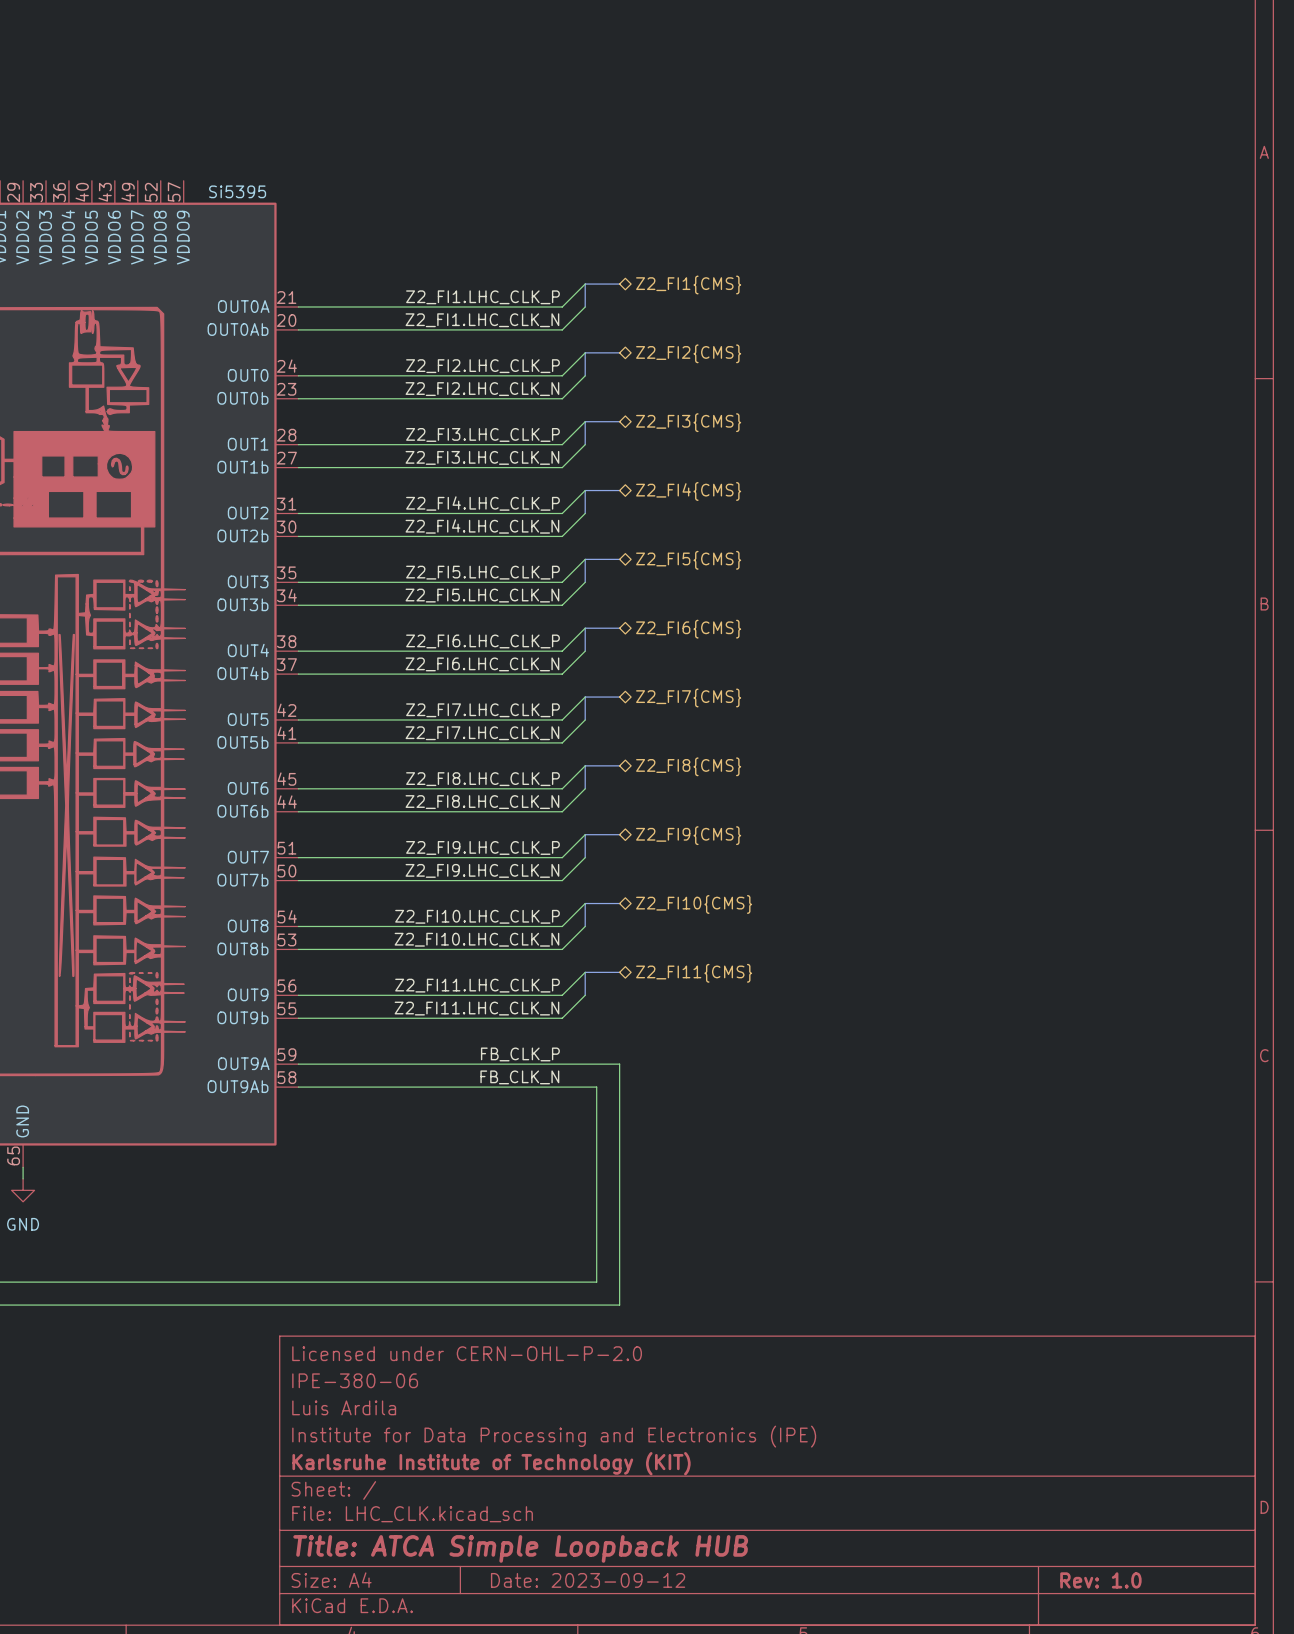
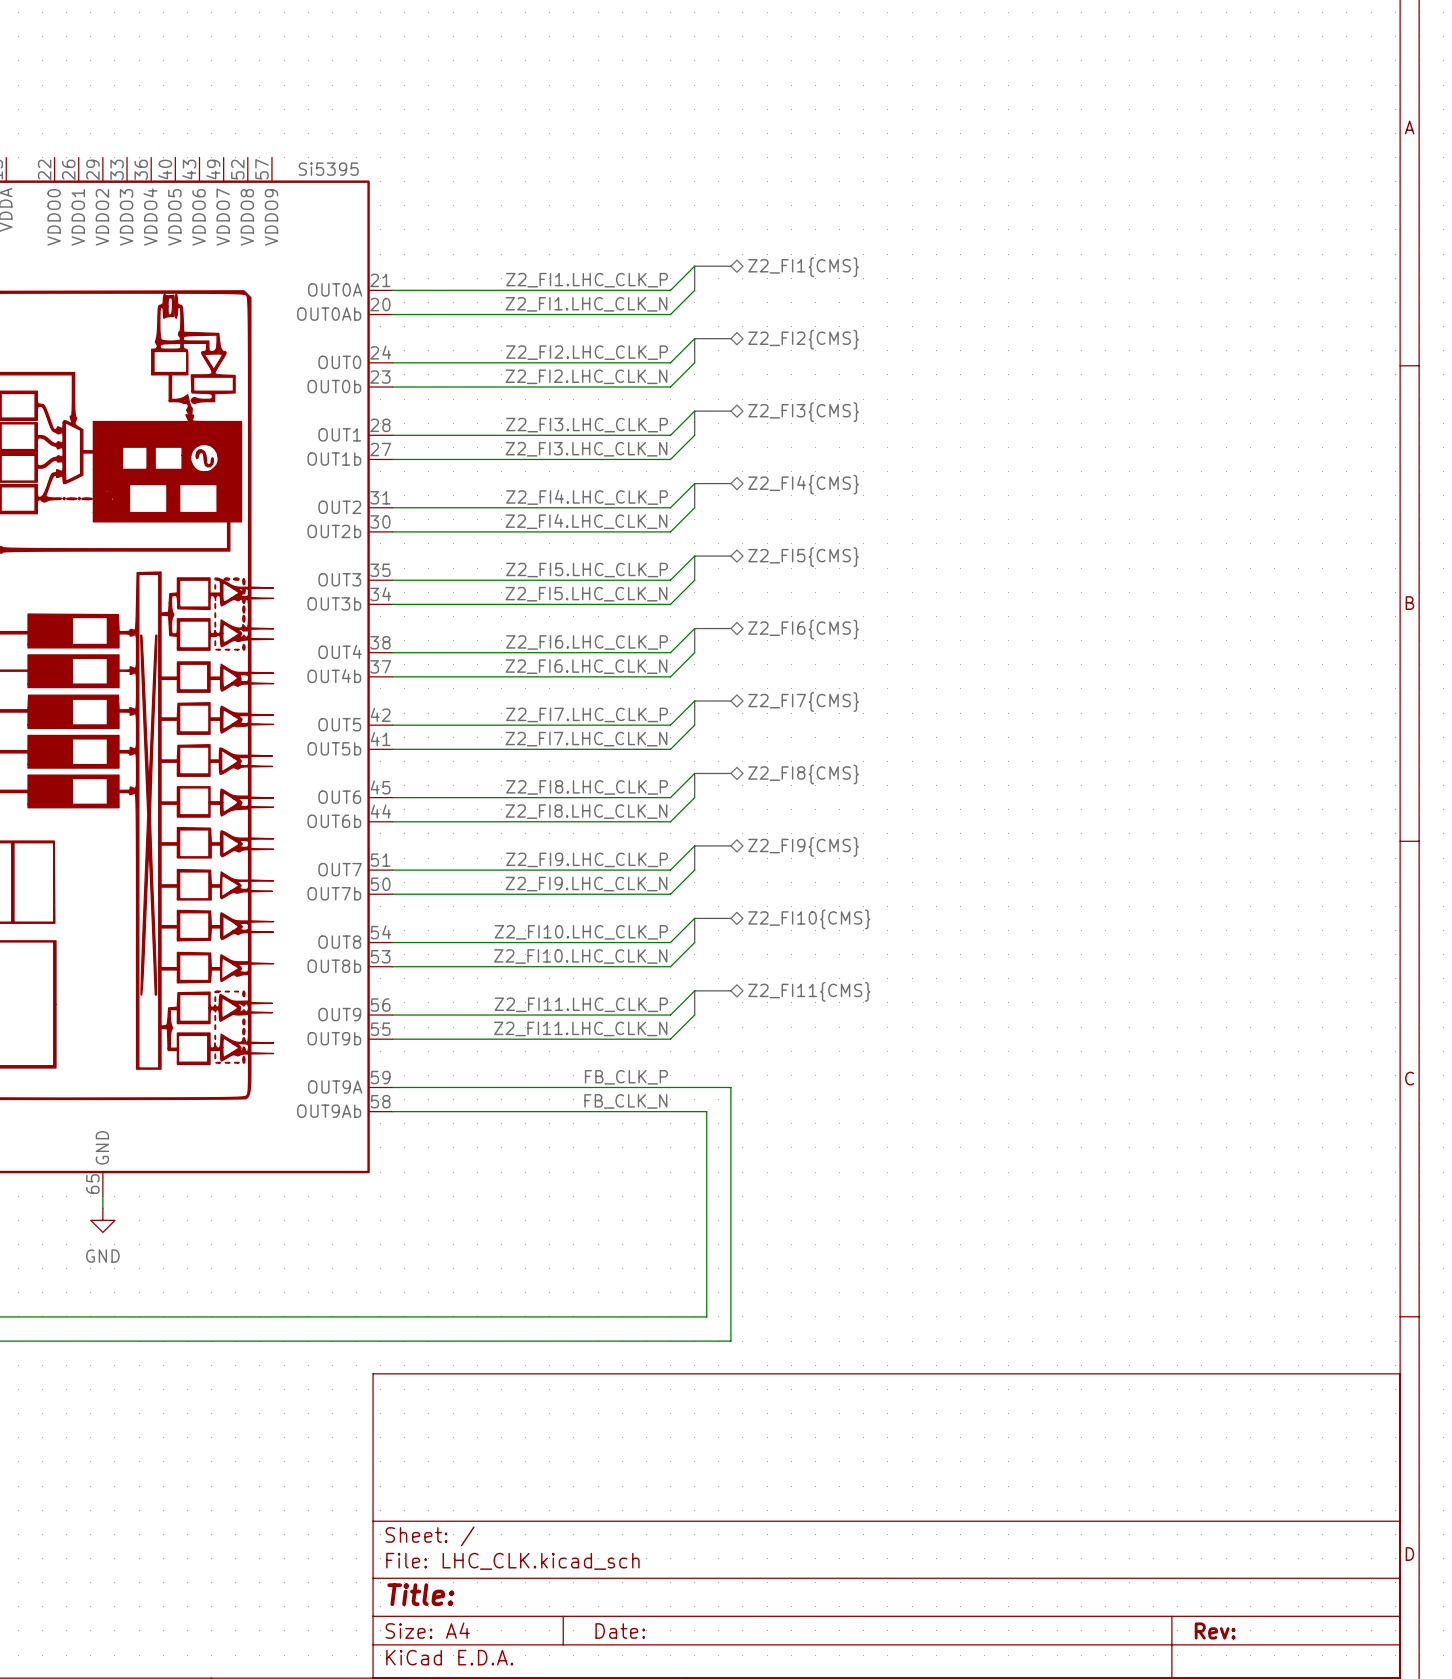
title block: Licensed under CERN-OHL-P-2.0 (467, 1353) -> none
title block: IPE-380-06 (355, 1380) -> none
title block: Luis Ardila (344, 1407) -> none
title block: Institute for Data Processing and Electronics (IPE) (554, 1436) -> none
title block: Karlsruhe Institute of Technology (KIT) (491, 1463) -> none
title block: Title: ATCA Simple Loopback HUB (520, 1548) -> Title: (420, 1594)
title block: Date: 2023-09-12 (588, 1580) -> Date: (620, 1631)
title block: Rev: 1.0 (1100, 1580) -> Rev: (1215, 1631)

